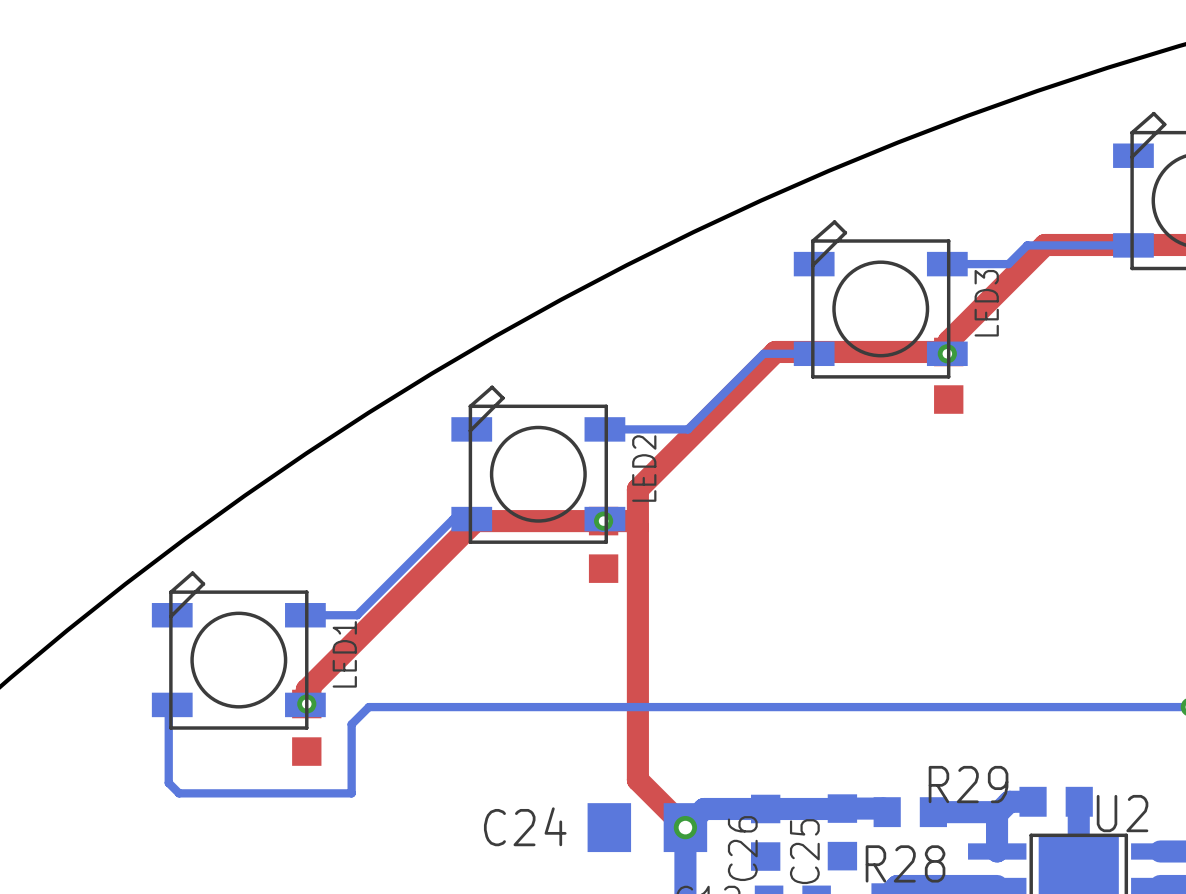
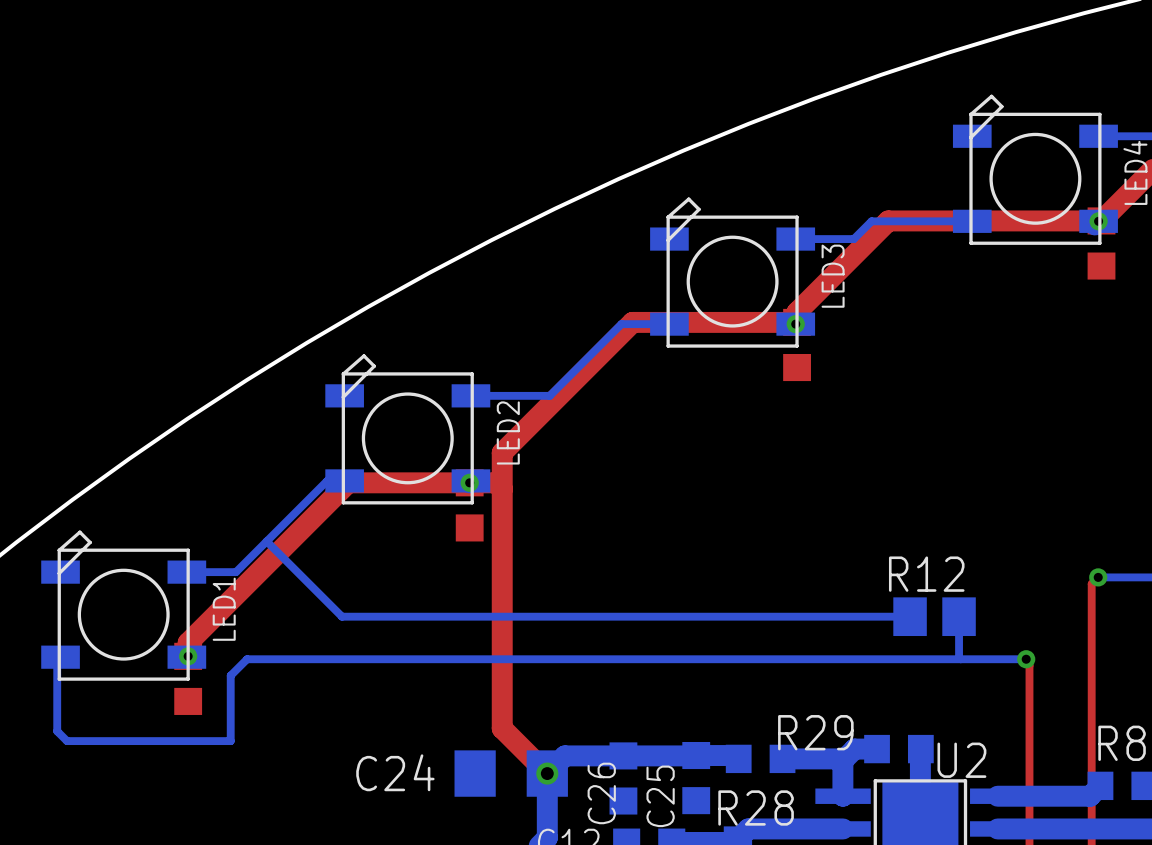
bottom track: none -> (266, 541) (342, 616) (910, 616)
R12: none -> (934, 616)
bottom track: none -> (959, 616) (959, 657) (960, 659)

